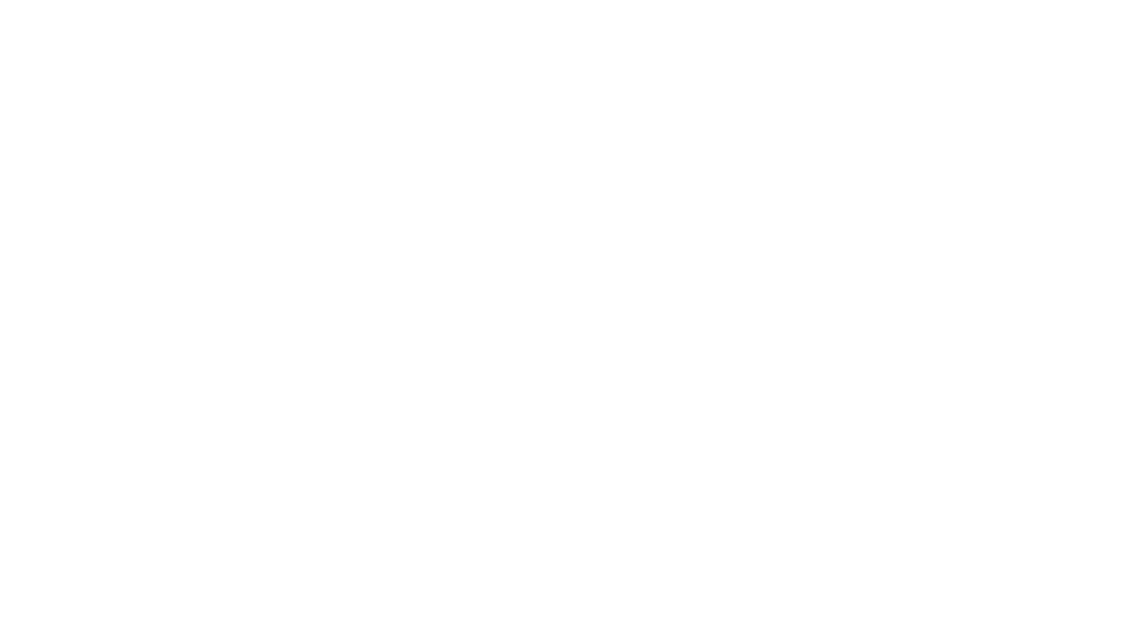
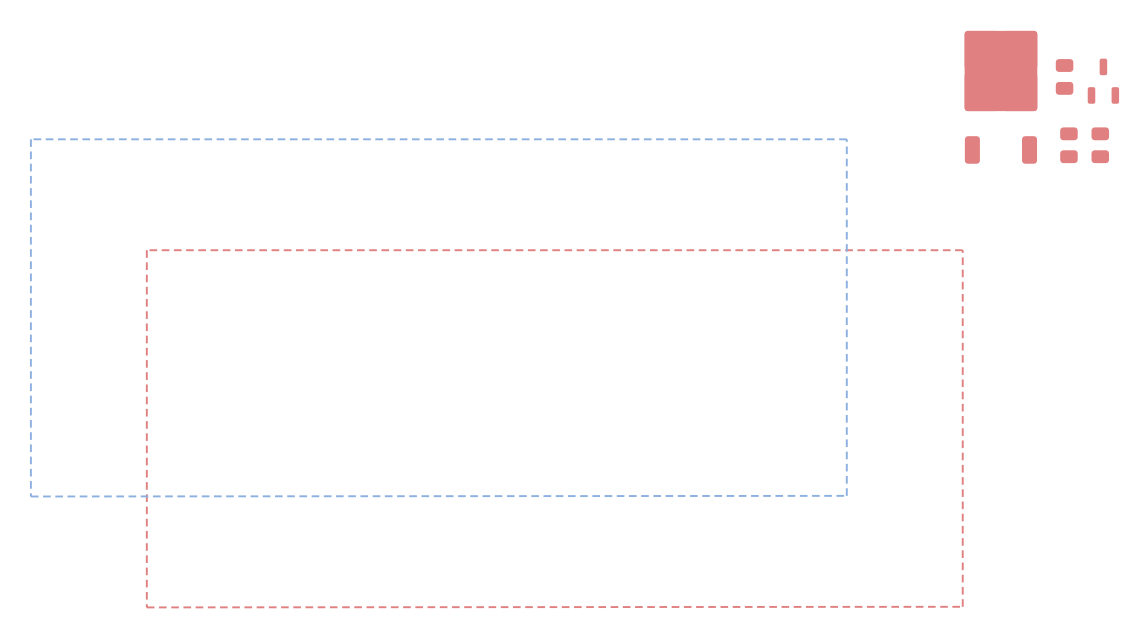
part: none -> (1064, 76)
part: none -> (1103, 81)
part: none -> (1000, 97)
bottom zone outline: none -> (846, 139) (846, 495) (30, 496) (30, 139) (846, 139)
part: none -> (1068, 145)
part: none -> (1100, 145)
top zone outline: none -> (962, 250) (962, 606) (146, 607) (146, 250) (962, 250)

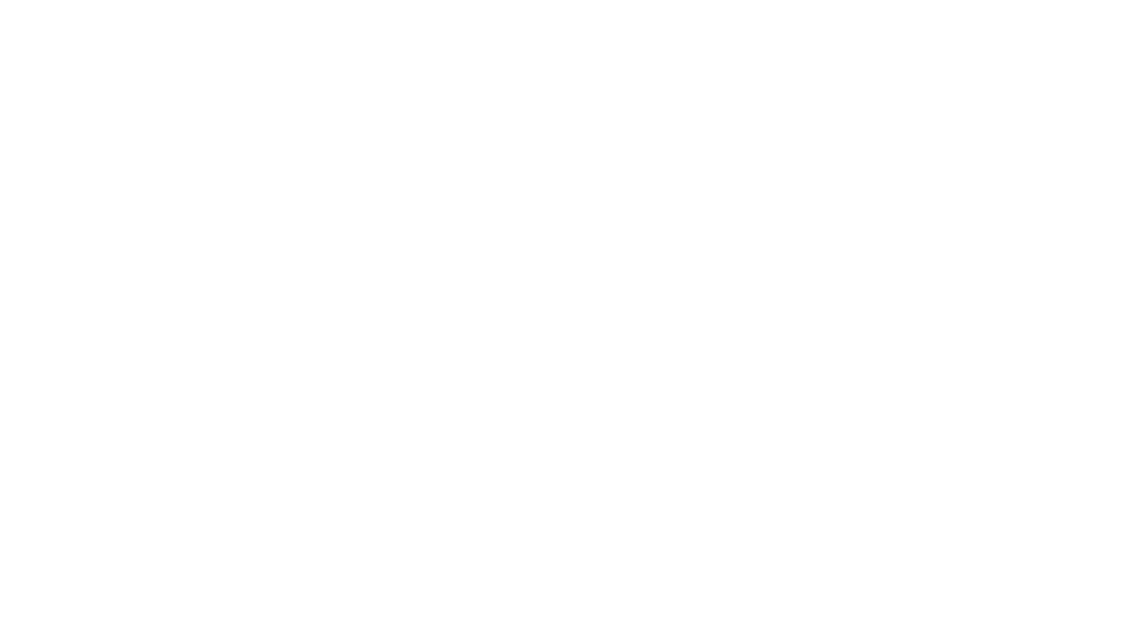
part: (1064, 76) -> none
part: (1103, 81) -> none
part: (1000, 97) -> none
bottom zone outline: (846, 139) (846, 495) (30, 496) (30, 139) (846, 139) -> none
part: (1068, 145) -> none
part: (1100, 145) -> none
top zone outline: (962, 250) (962, 606) (146, 607) (146, 250) (962, 250) -> none

